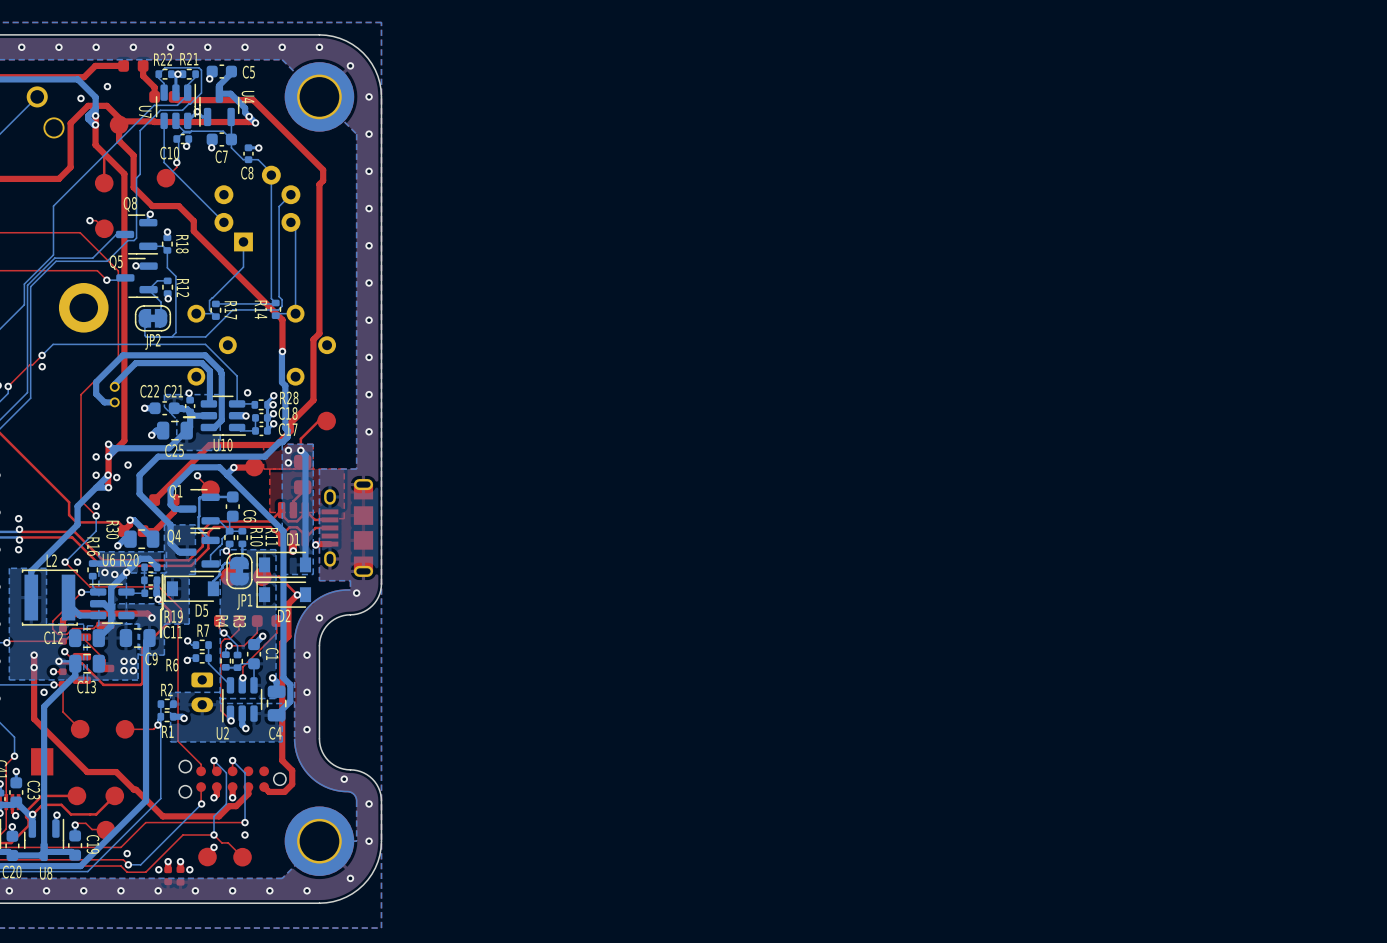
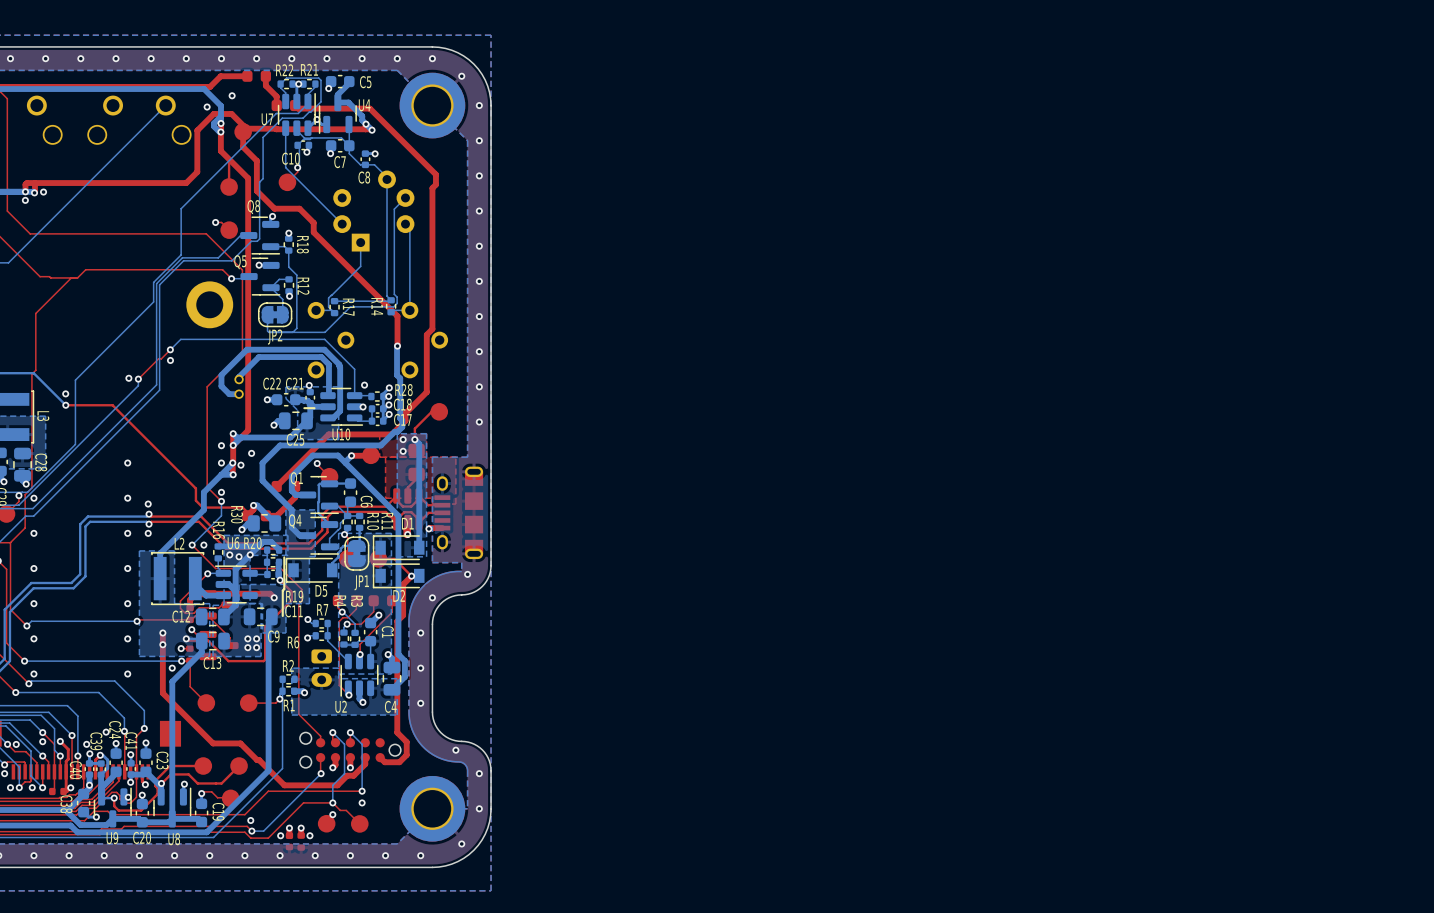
U4 name rotation: 0° (247, 97) -> 90° counterclockwise (364, 105)
U7 name rotation: 0° (145, 111) -> 90° counterclockwise (267, 119)

